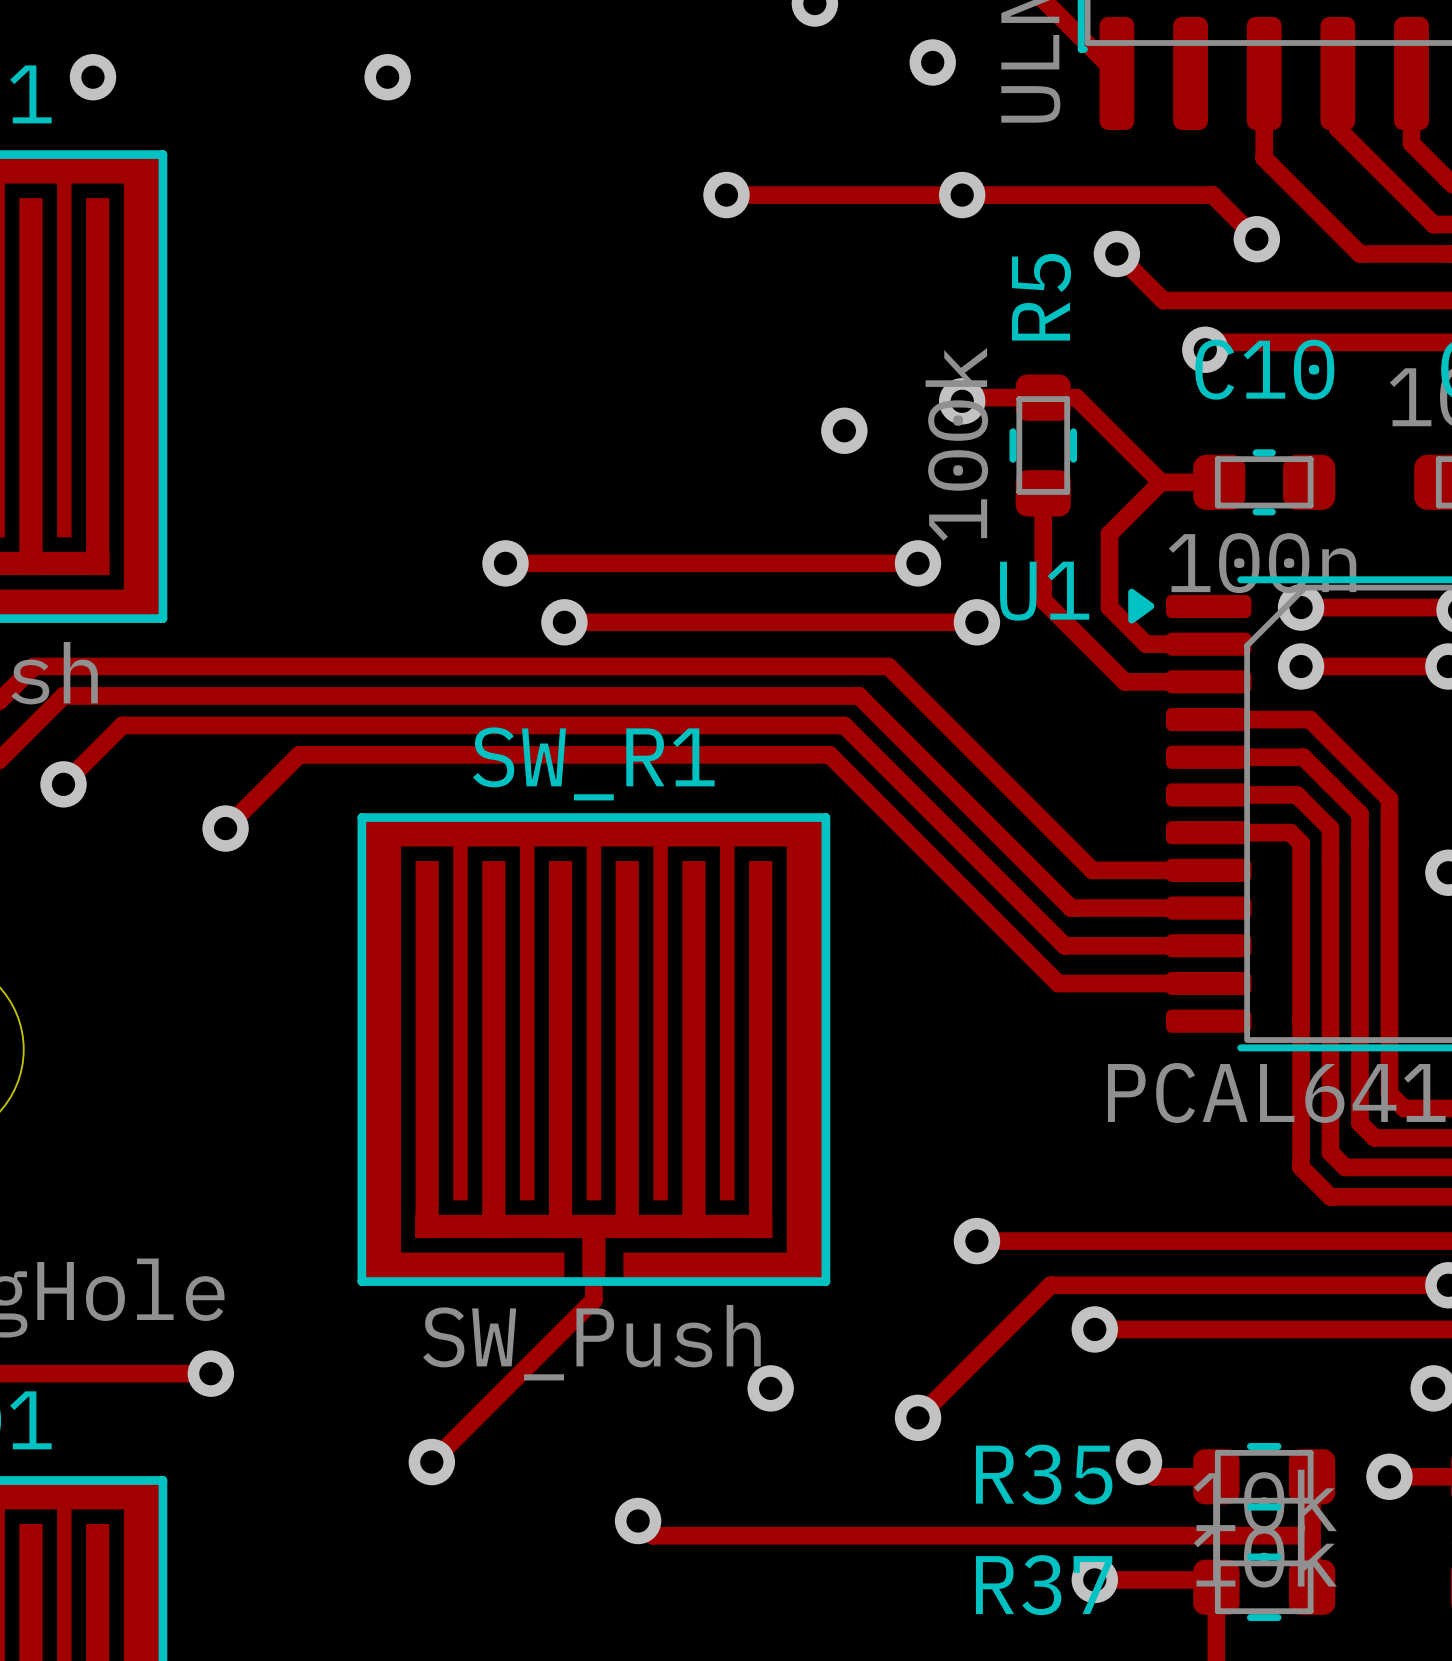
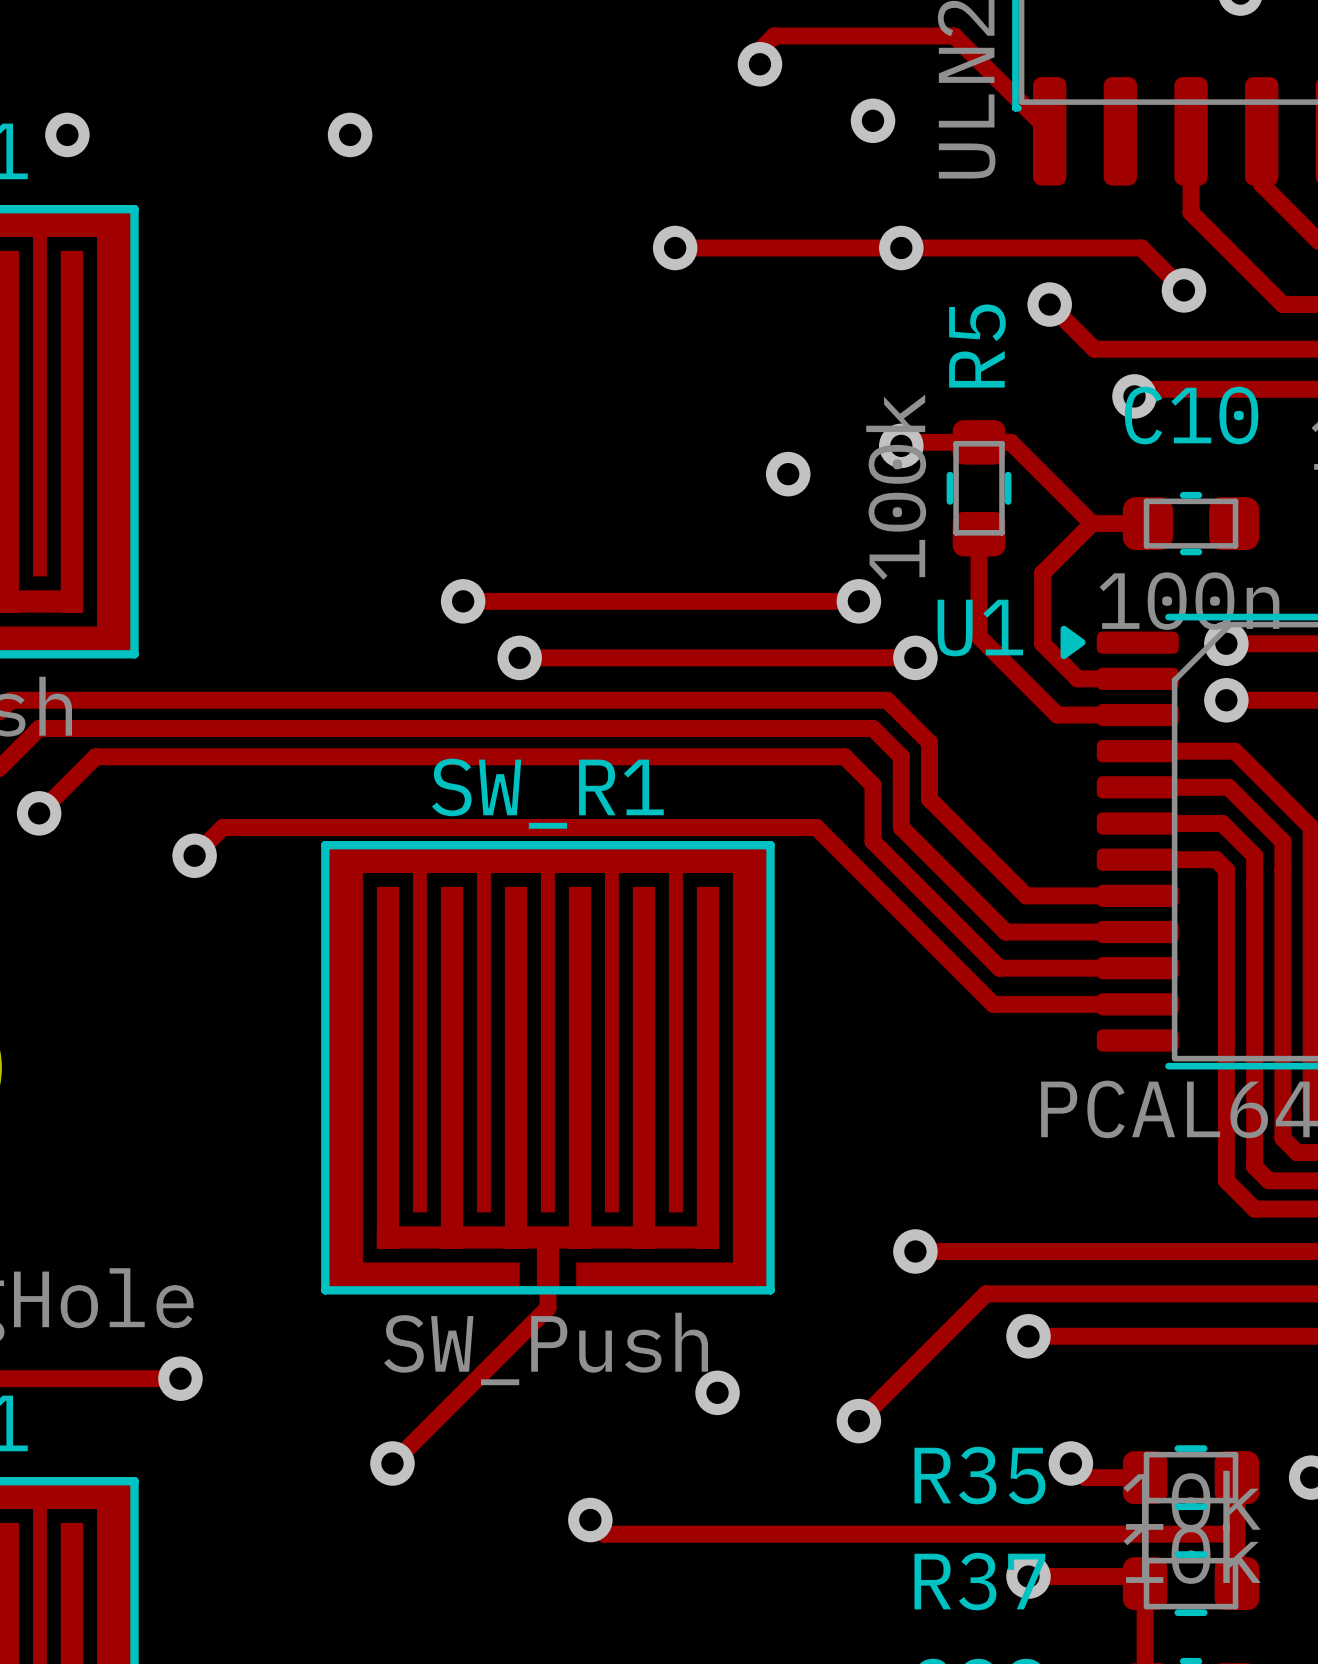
track: (888, 666) (991, 769) -> (830, 700) (887, 700) (929, 742) (929, 799)
track: (859, 695) (962, 799) -> (802, 728) (873, 728) (901, 756) (901, 827)
track: (844, 725) (932, 813) -> (788, 756) (844, 756) (873, 785) (873, 841)
track: (255, 799) (299, 754) (829, 754) (873, 799) -> (222, 827) (816, 827)

